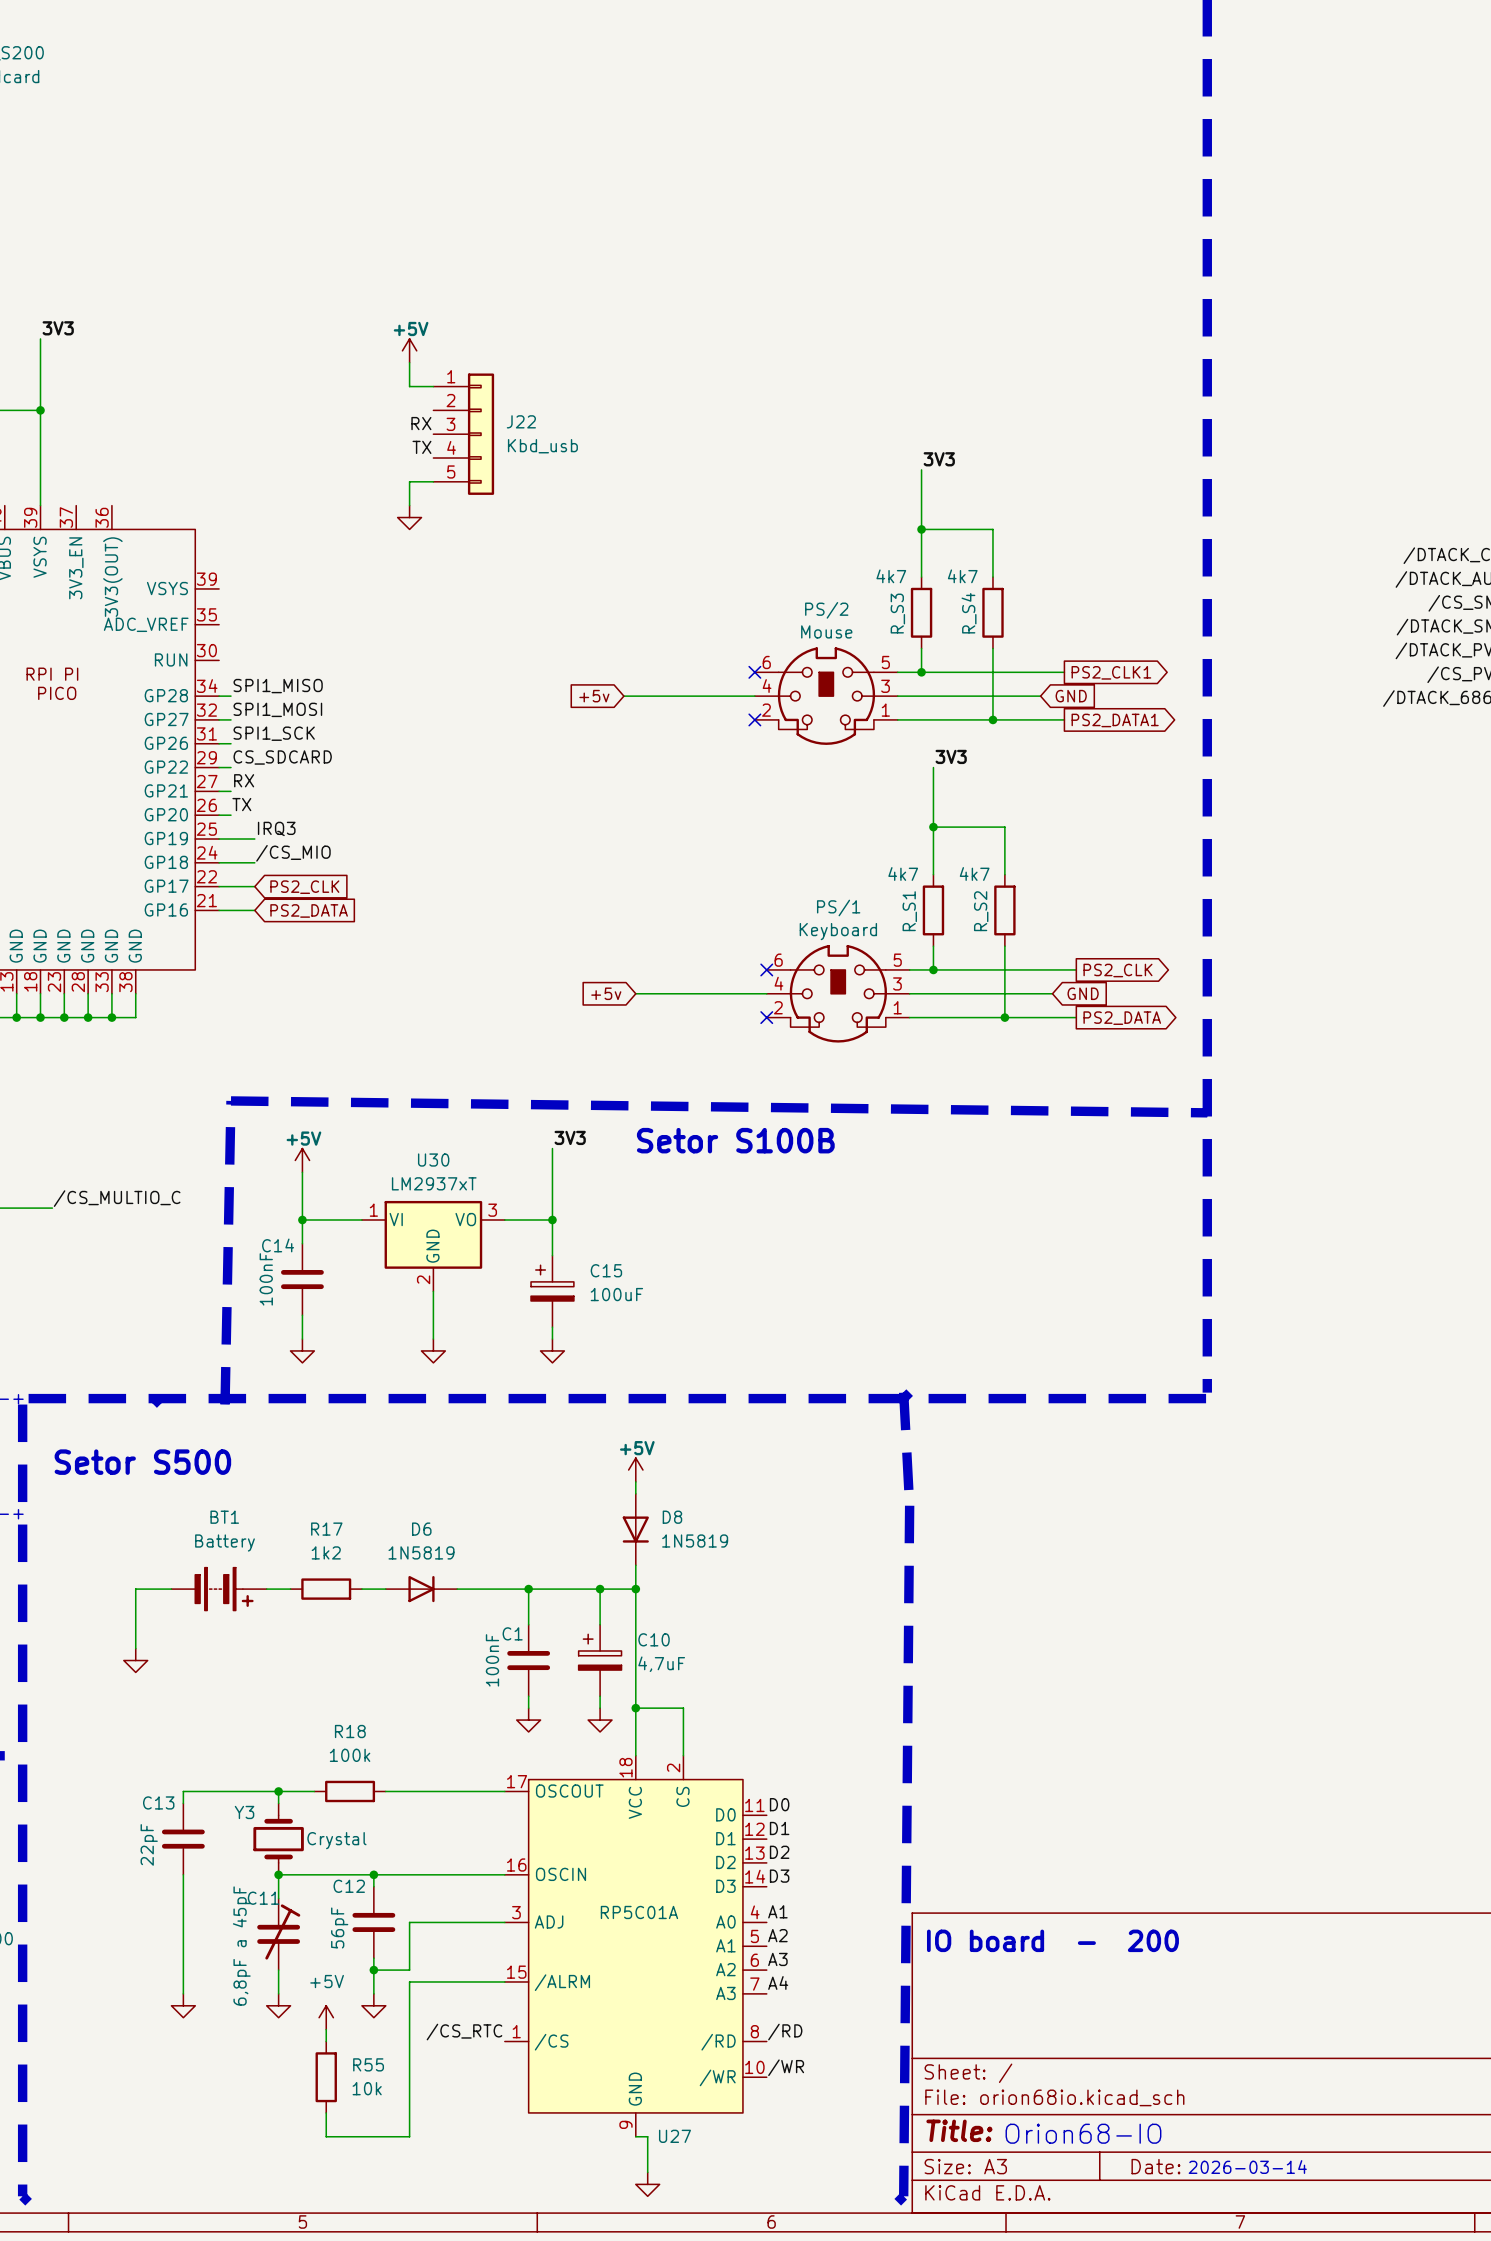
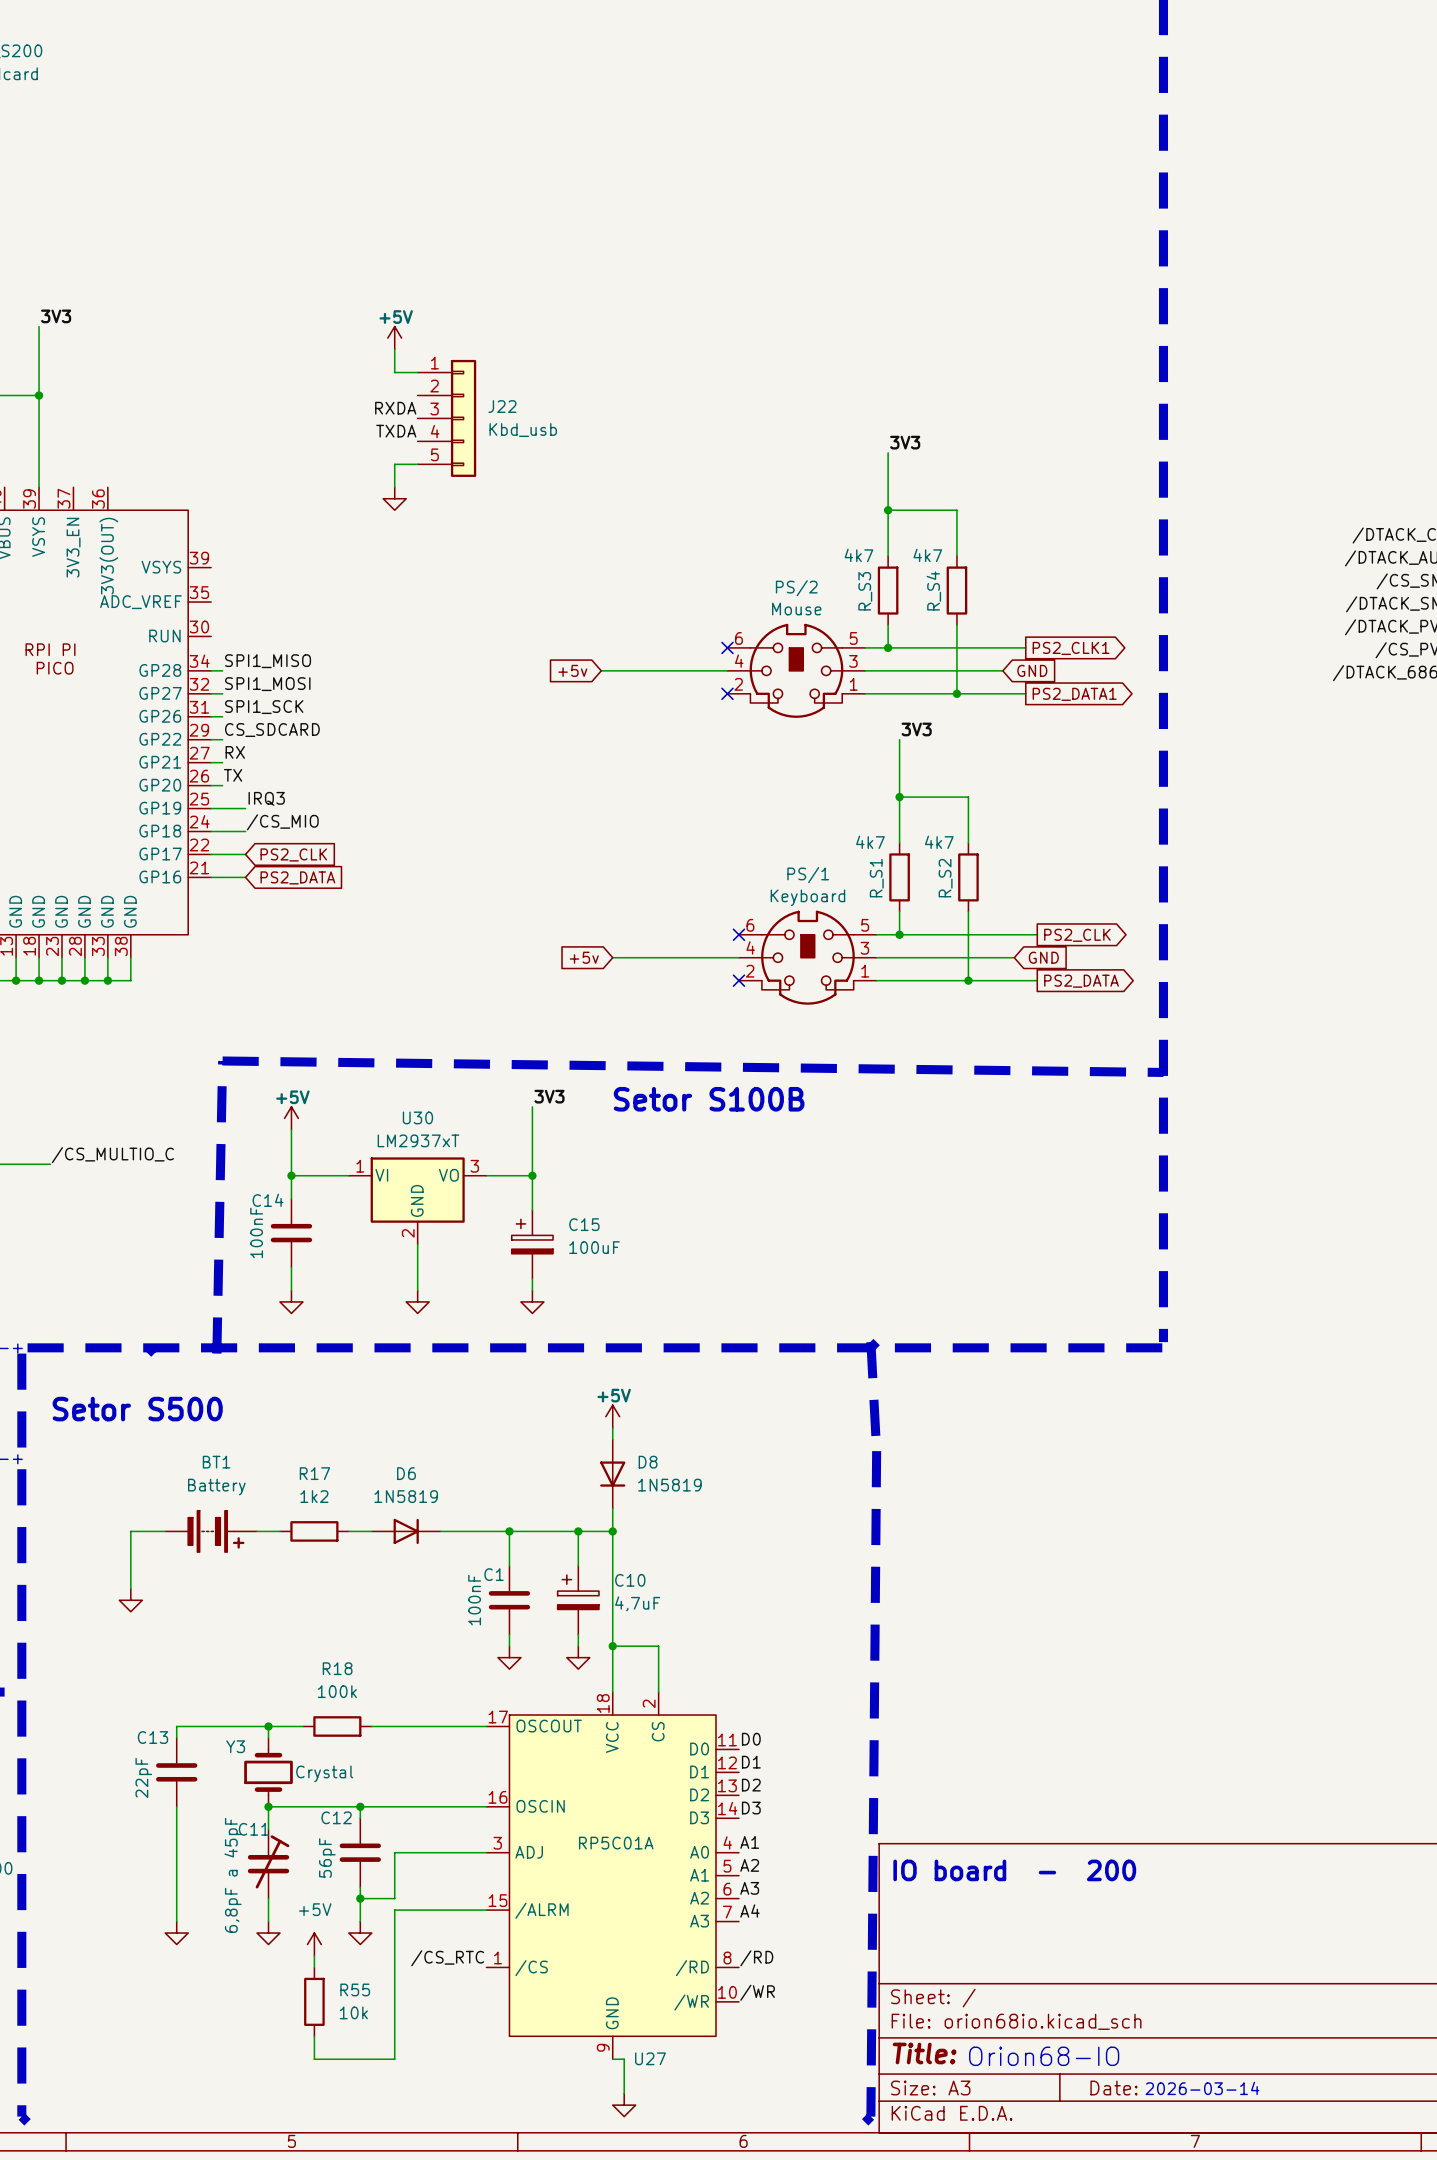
label: RX (421, 423) -> RXDA (395, 408)
label: TX (421, 447) -> TXDA (396, 431)

